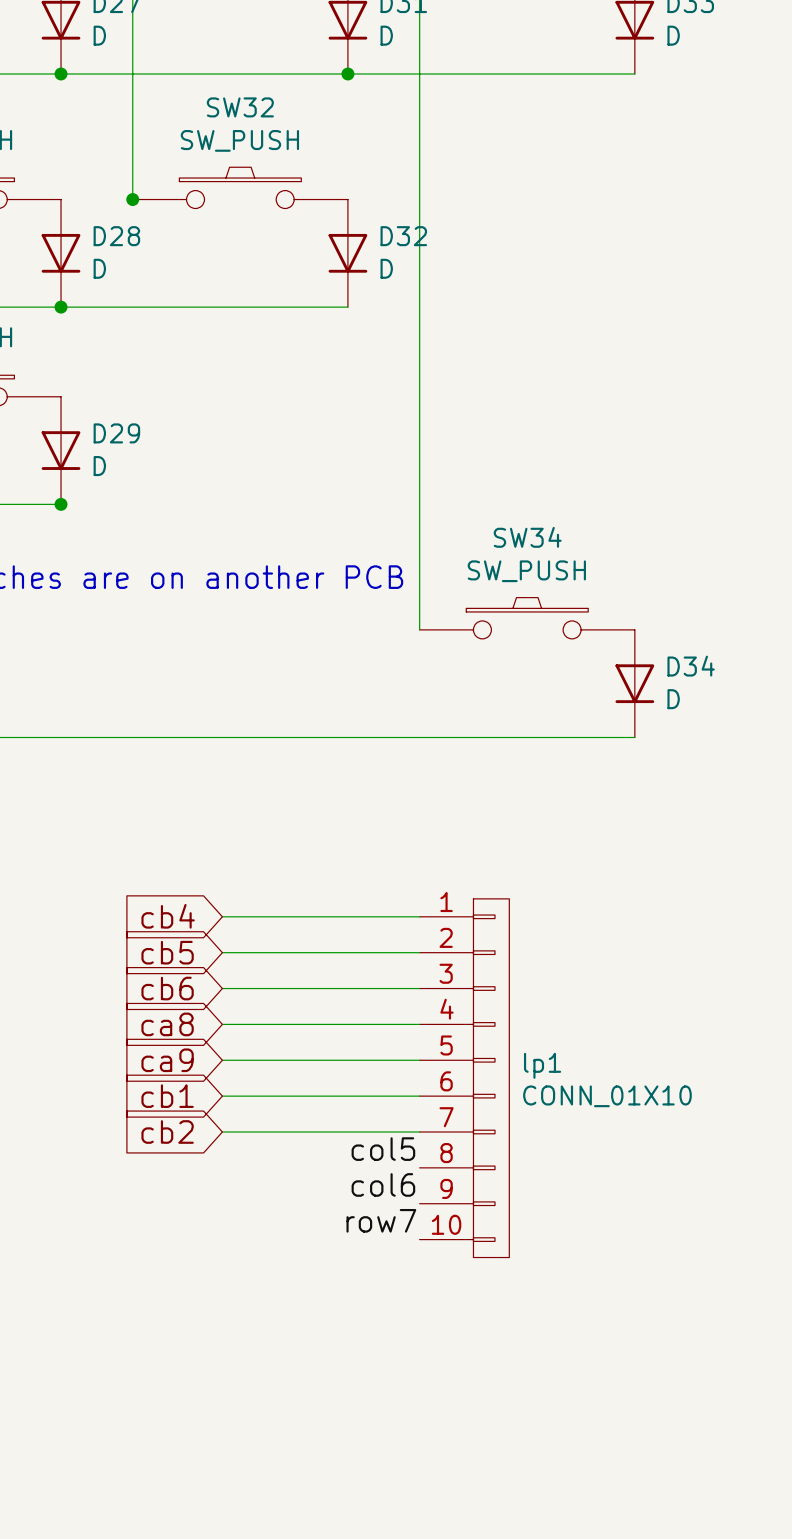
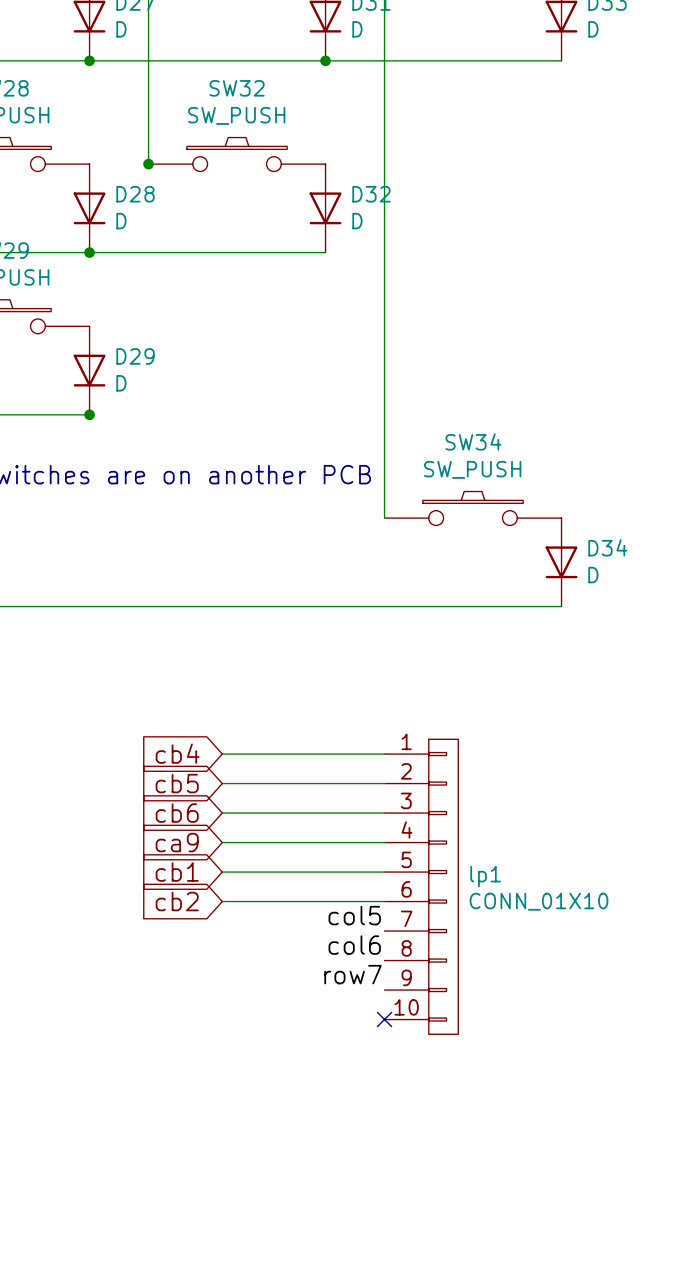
global label: ca8 (167, 1024) -> ca9 (177, 842)
global label: ca9 (167, 1060) -> cb1 (177, 872)
global label: cb1 (167, 1096) -> cb2 (177, 901)
label: none -> col5 (354, 915)
global label: cb2 (167, 1132) -> none
wire: (222, 1132) (419, 1132) -> none
label: col5 (383, 1149) -> col6 (354, 945)
label: col6 (383, 1184) -> row7 (353, 974)
label: row7 (381, 1220) -> none
no-connect mark: none -> (384, 1019)

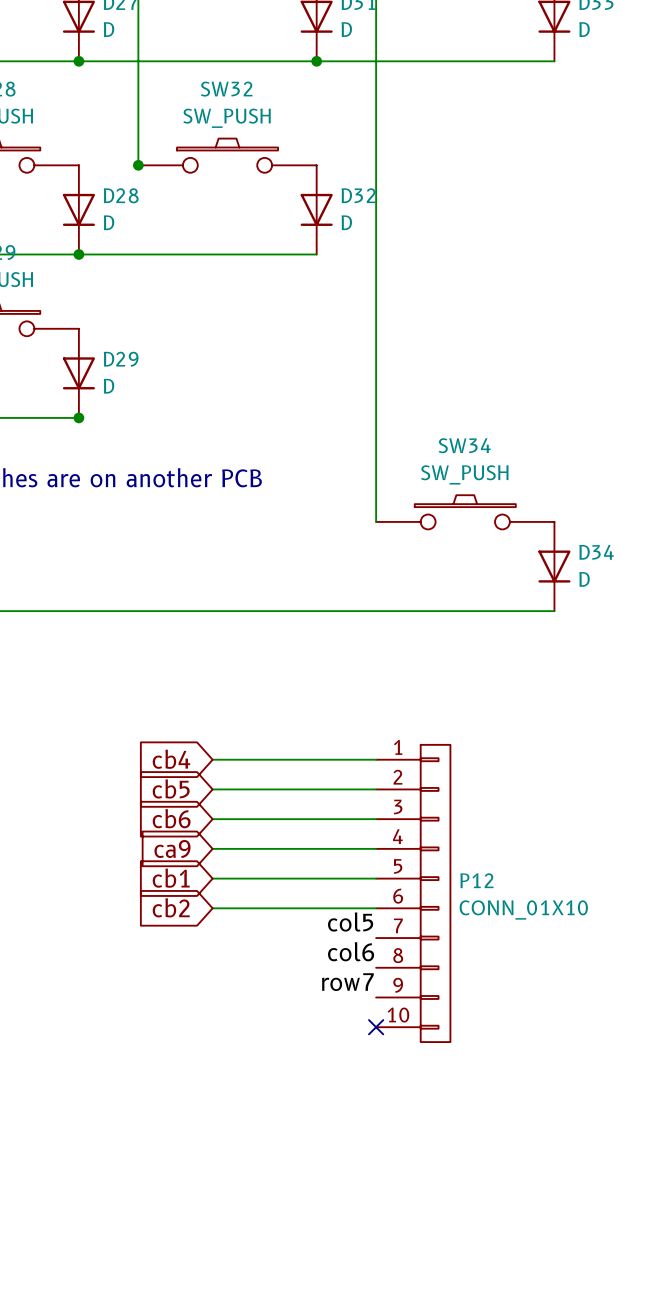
lp1 name: lp1 (485, 876) -> P12 (476, 880)

